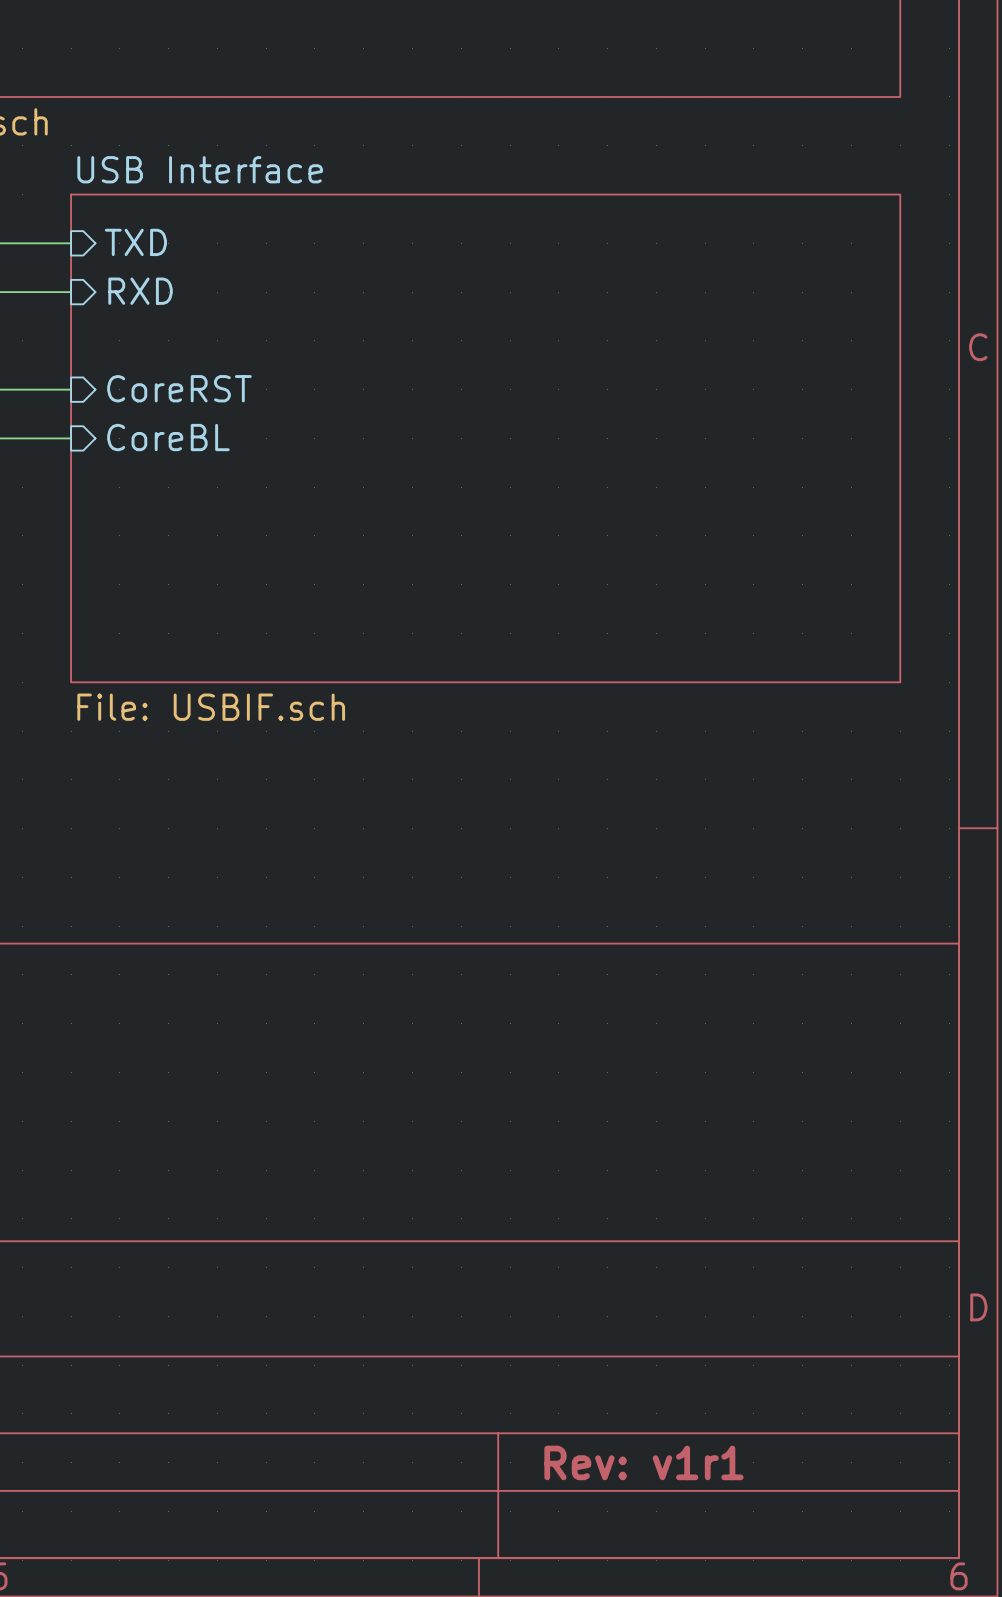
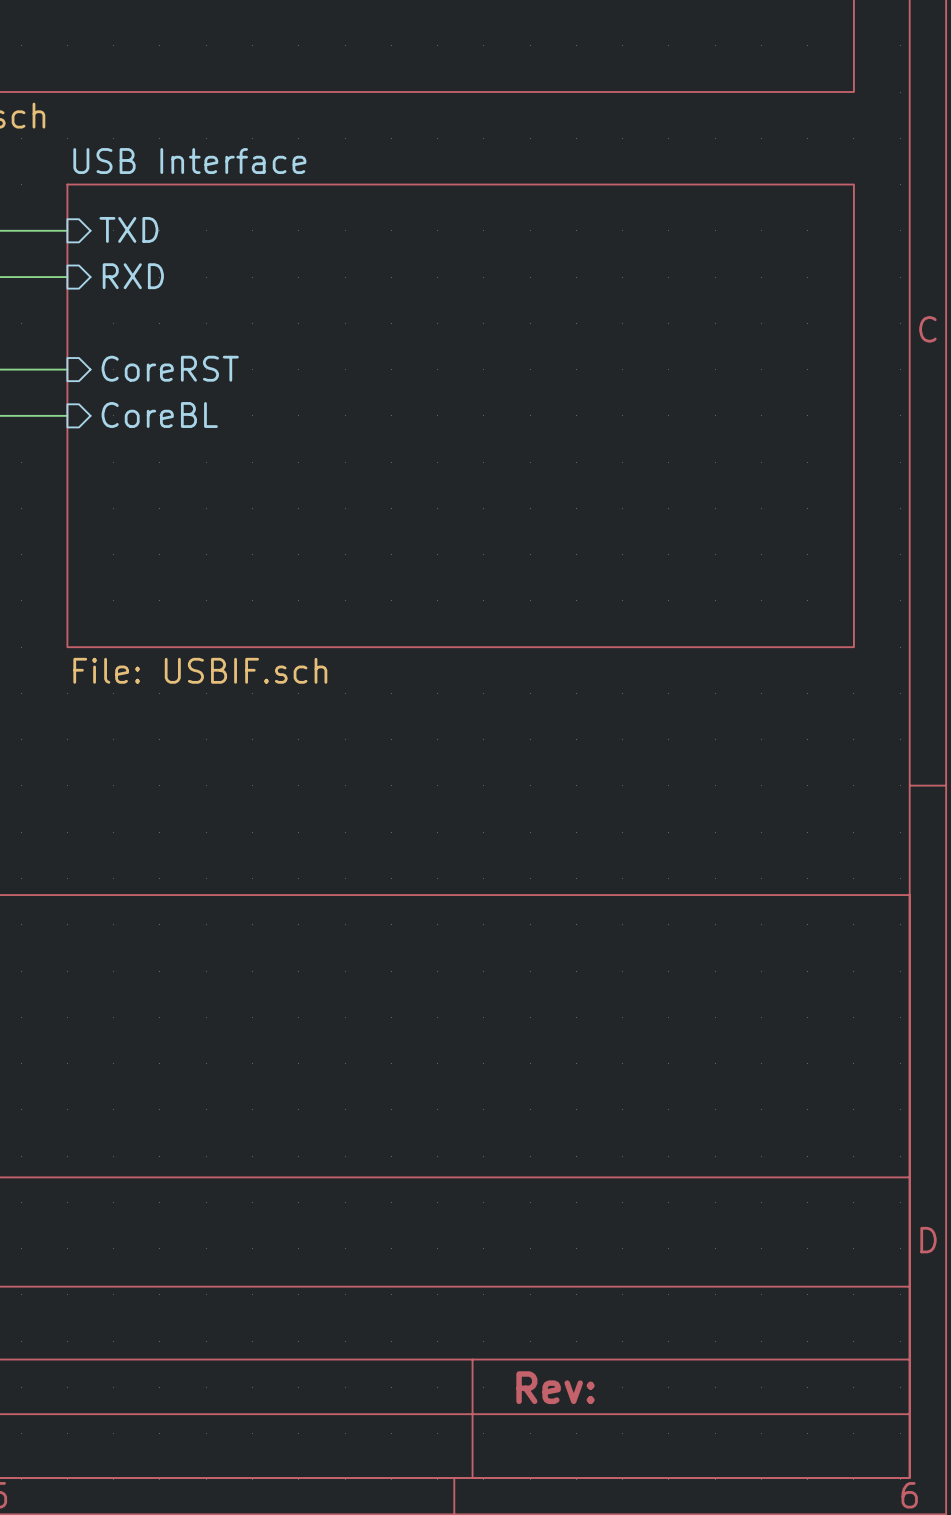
title block: Rev: v1r1 (643, 1462) -> Rev: (555, 1387)

